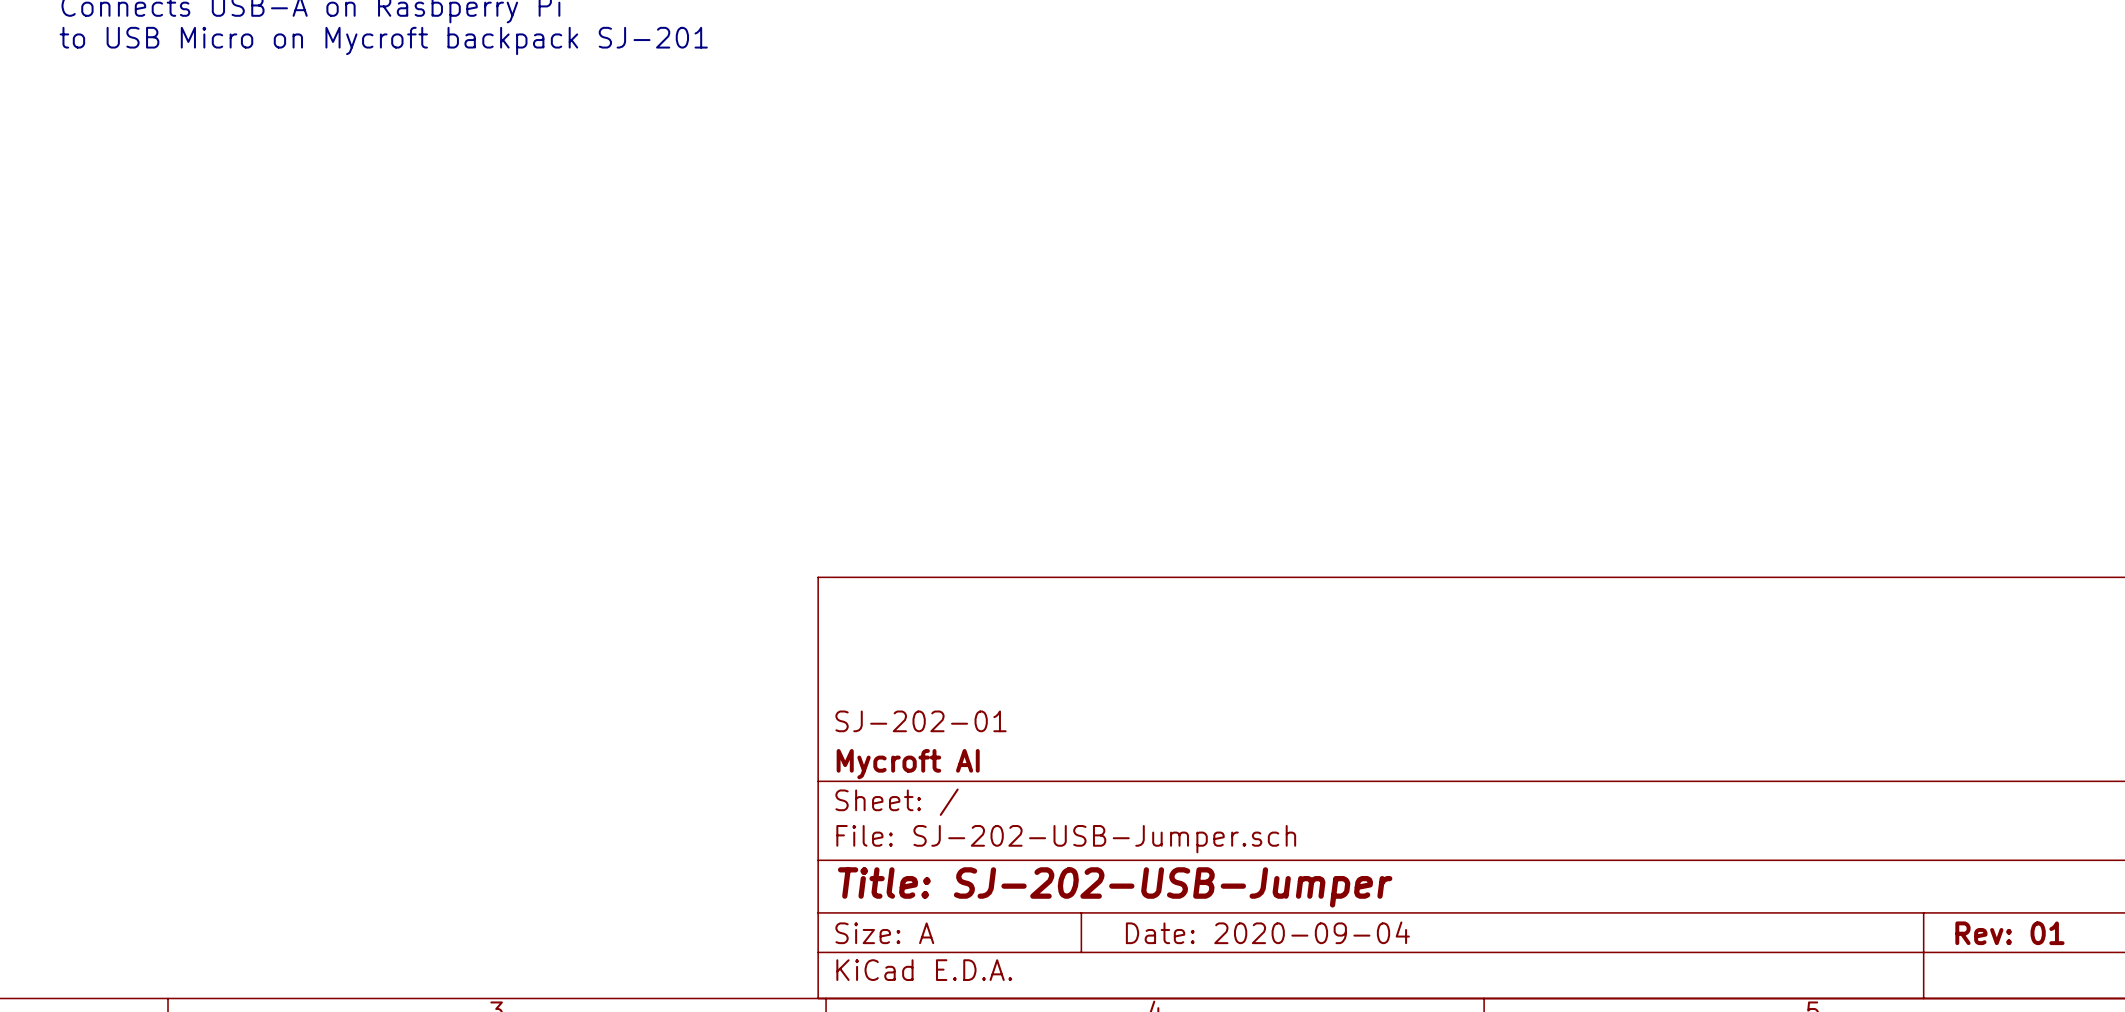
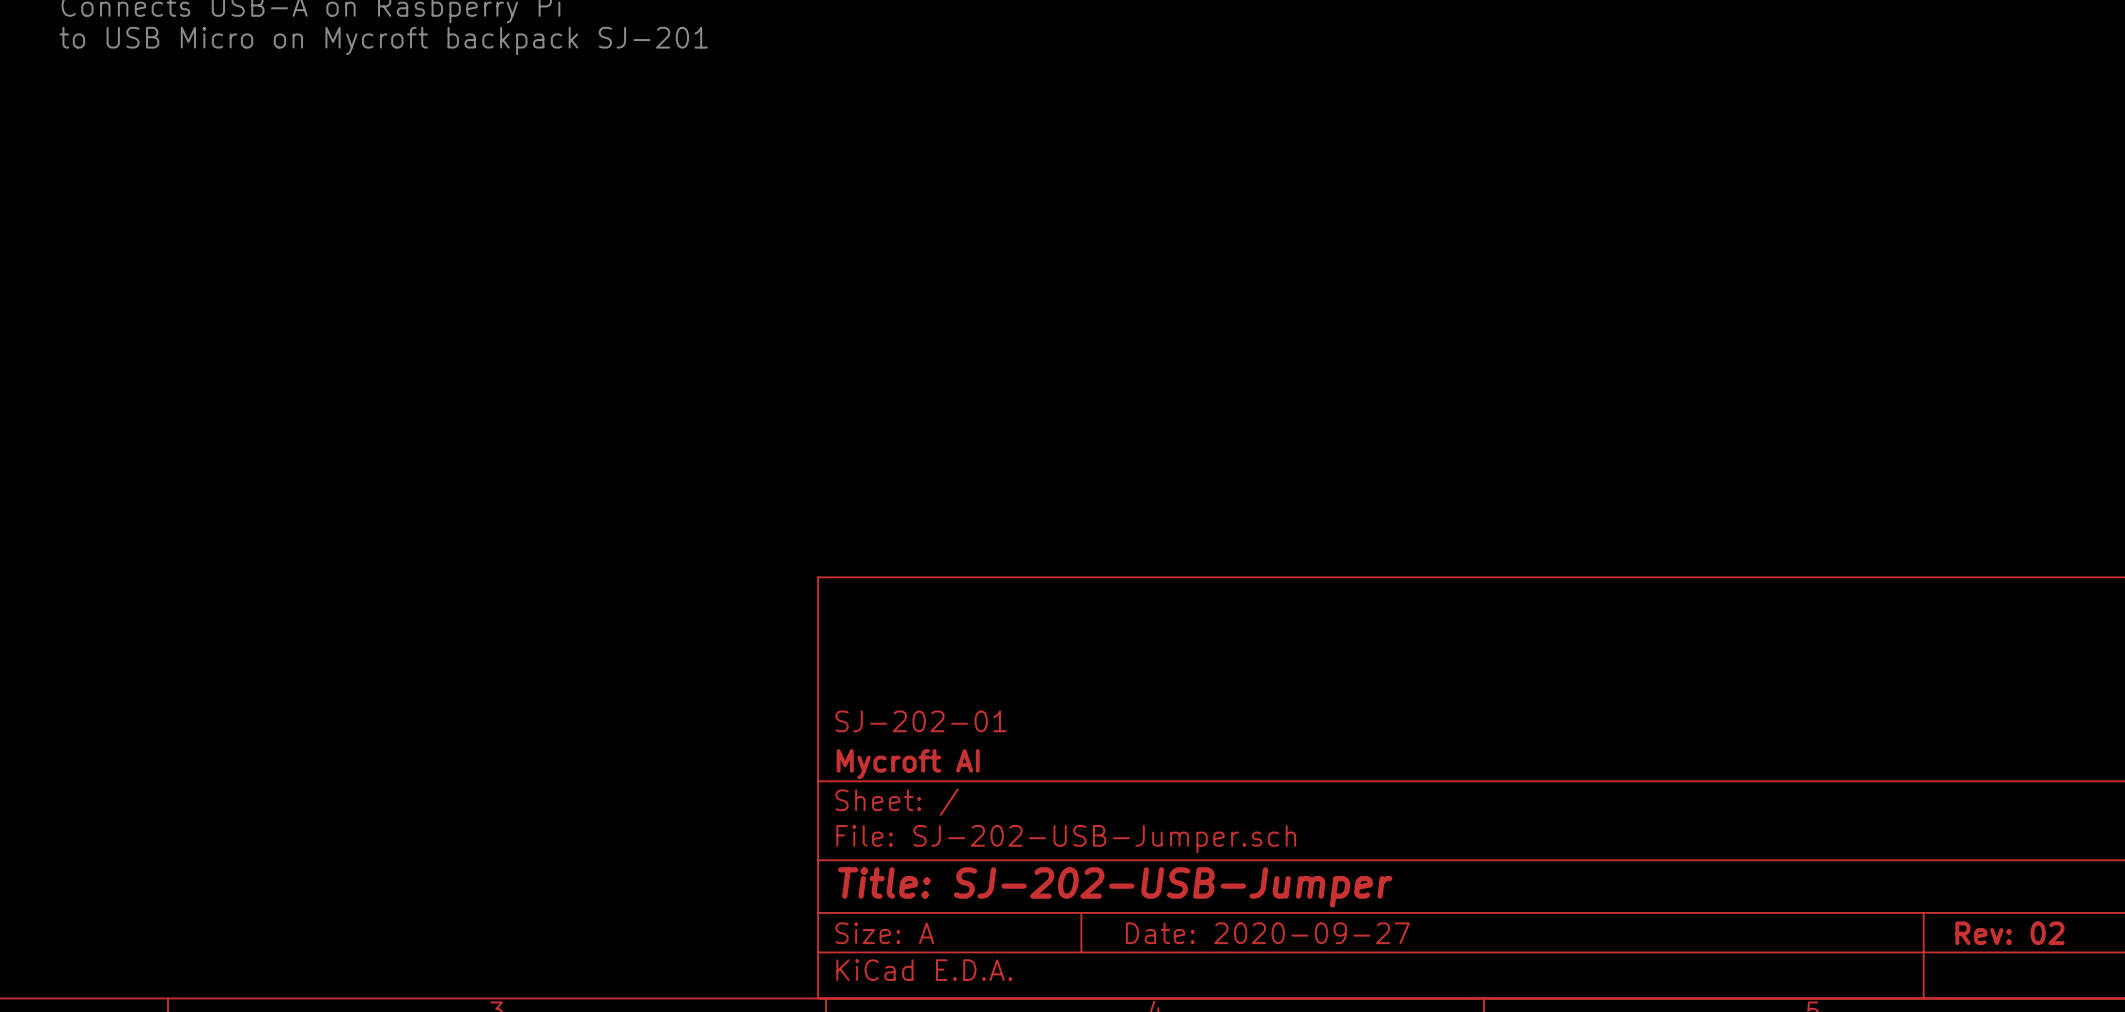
title block: Date: 2020-09-04 (1267, 932) -> Date: 2020-09-27 (1267, 933)
title block: Rev: 01 (2009, 933) -> Rev: 02 (2009, 933)

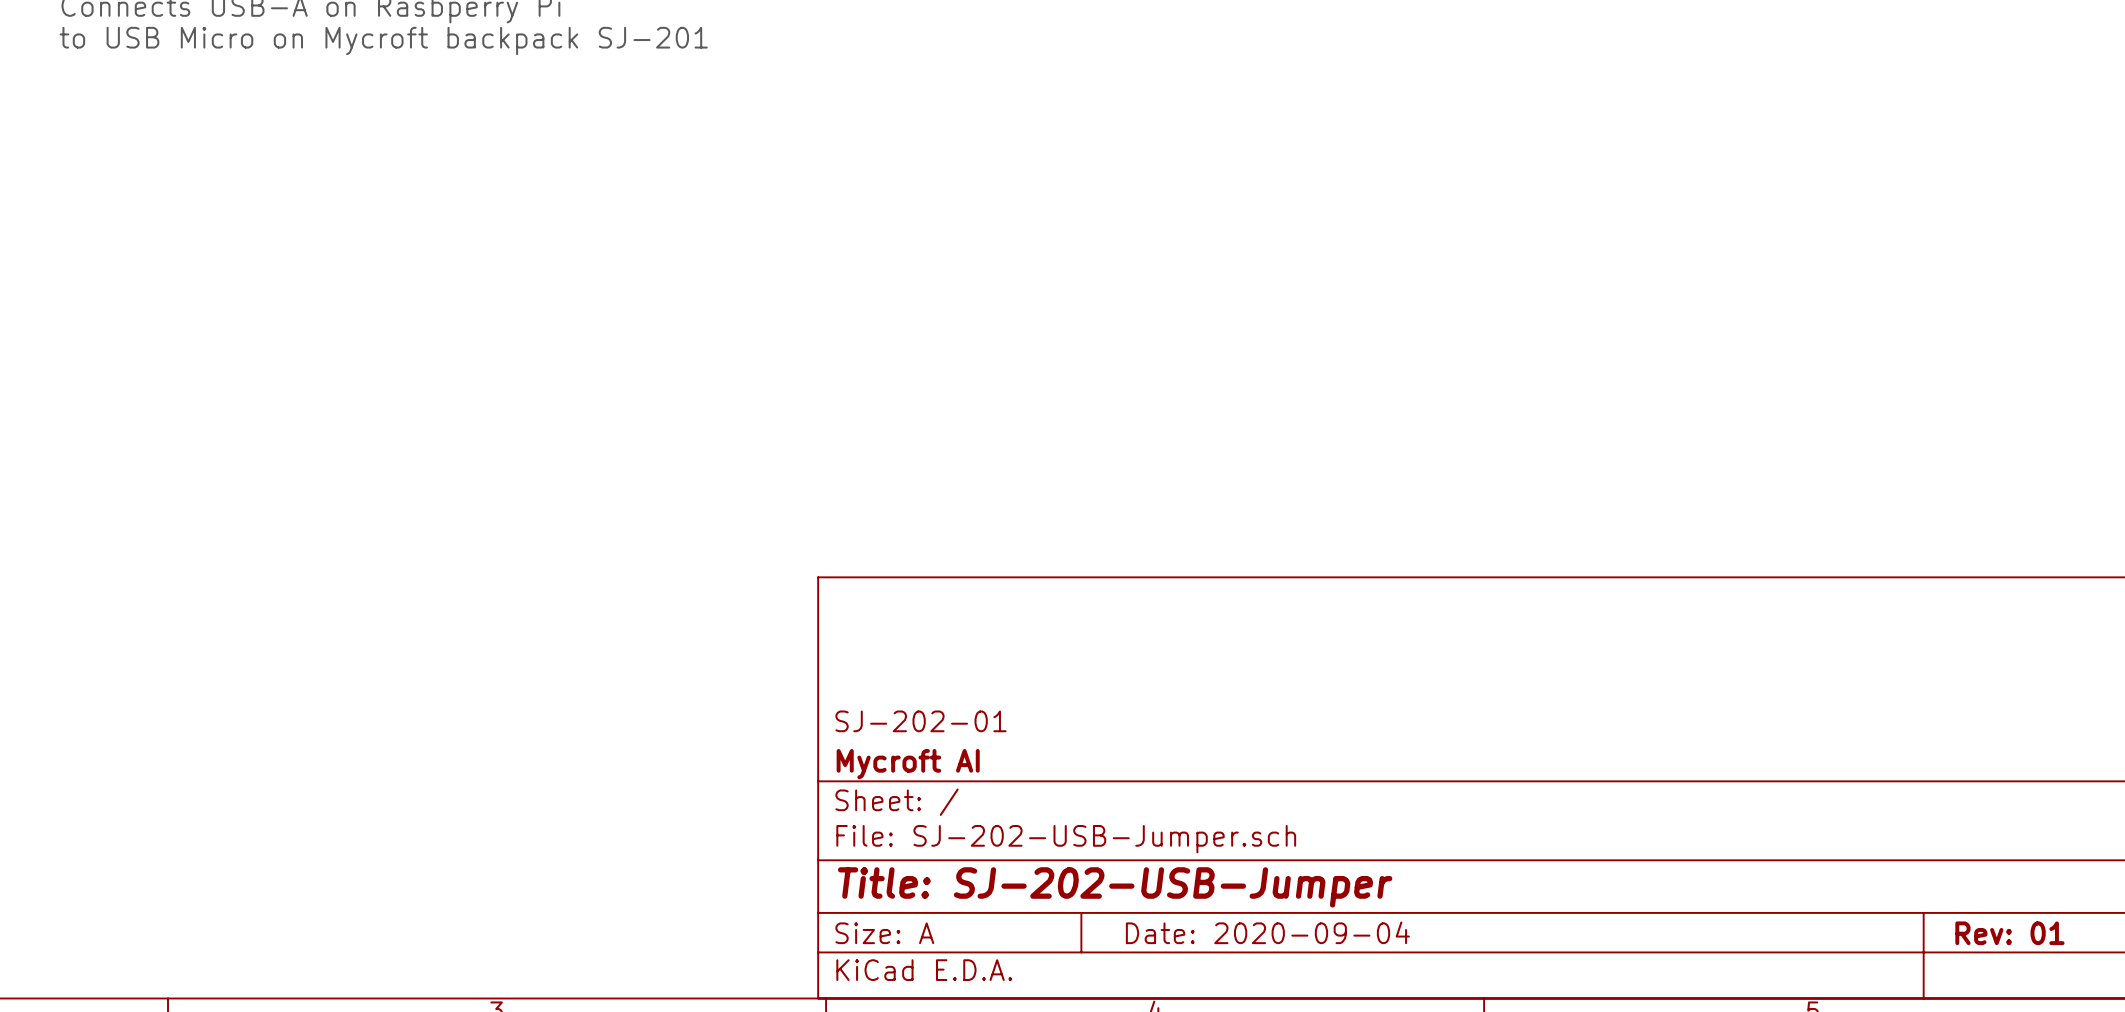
title block: Date: 2020-09-27 (1267, 933) -> Date: 2020-09-04 (1267, 932)
title block: Rev: 02 (2009, 933) -> Rev: 01 (2009, 933)

